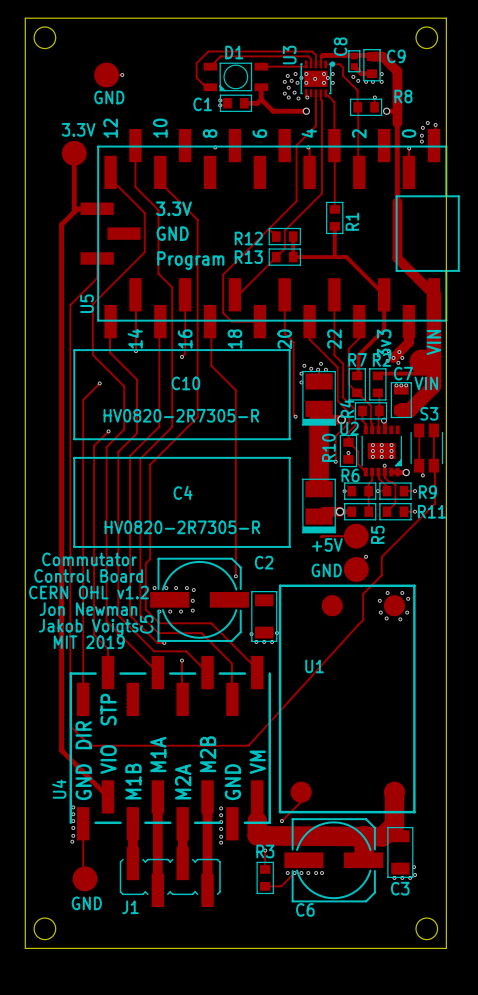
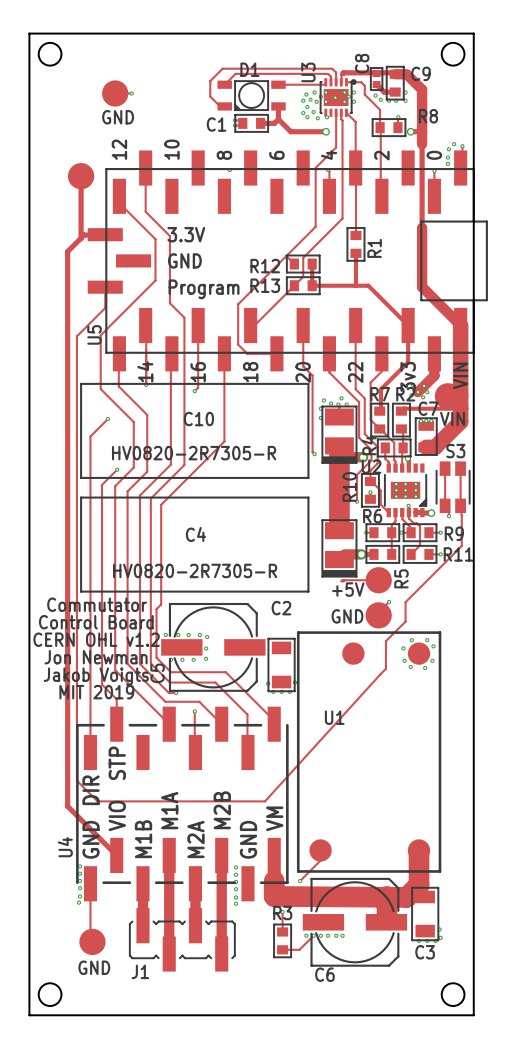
text: 3.3V (78, 129) -> none
track: (160, 172) (160, 182) (197, 219) (197, 417) -> (224, 353) (224, 441) (211, 454)
track: (210, 321) (211, 365) (235, 390) (235, 576) -> none
via: (235, 576) -> none

